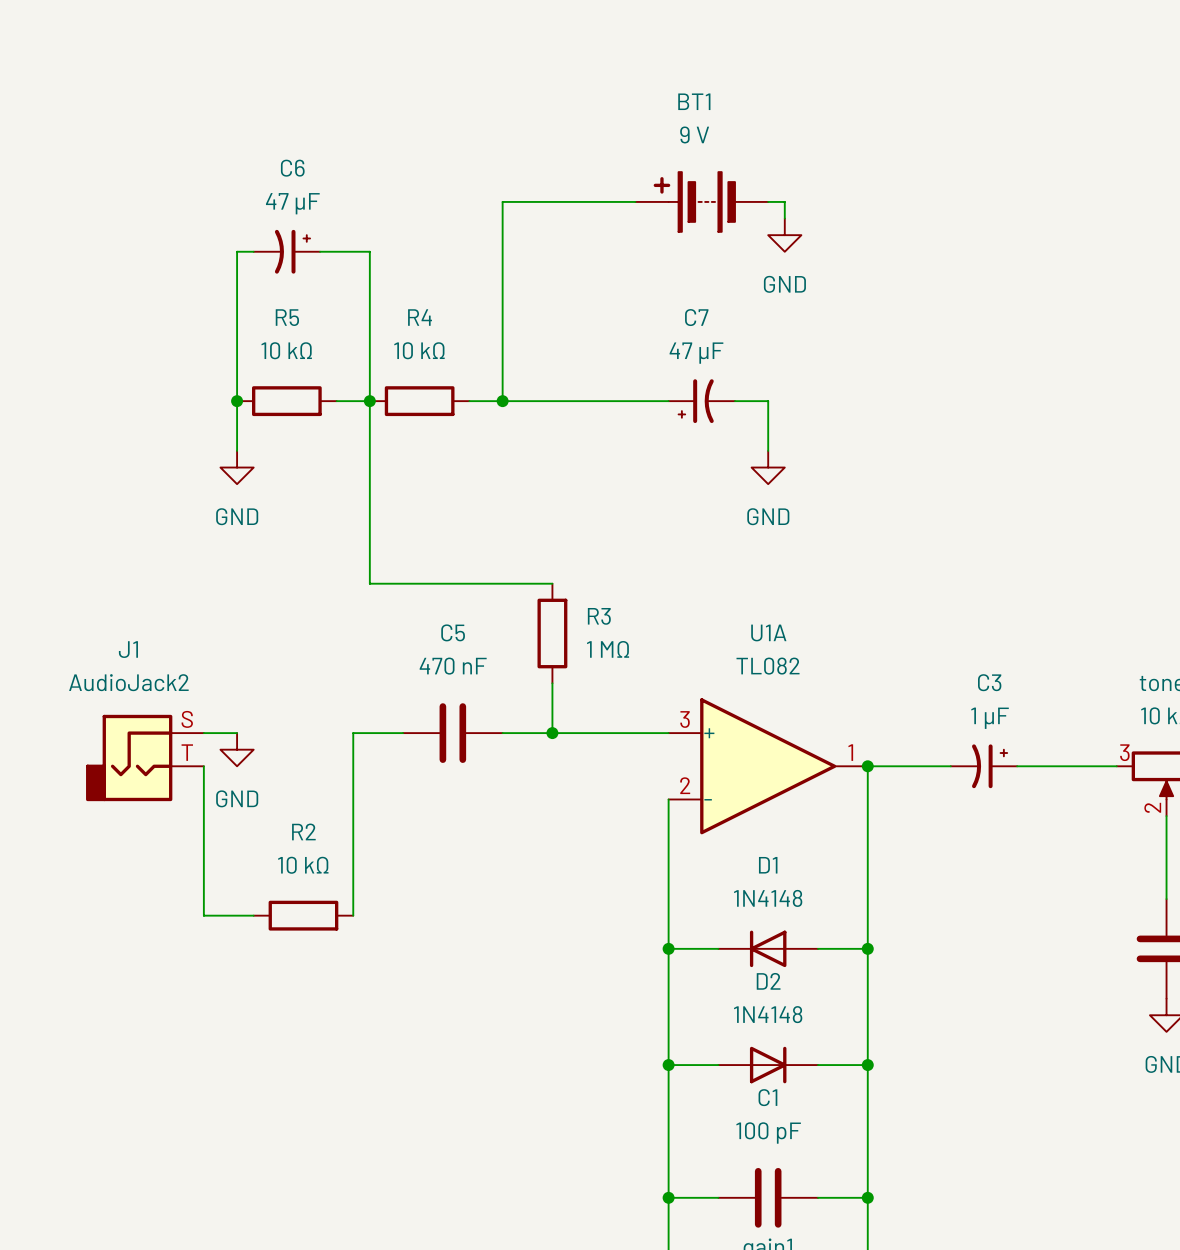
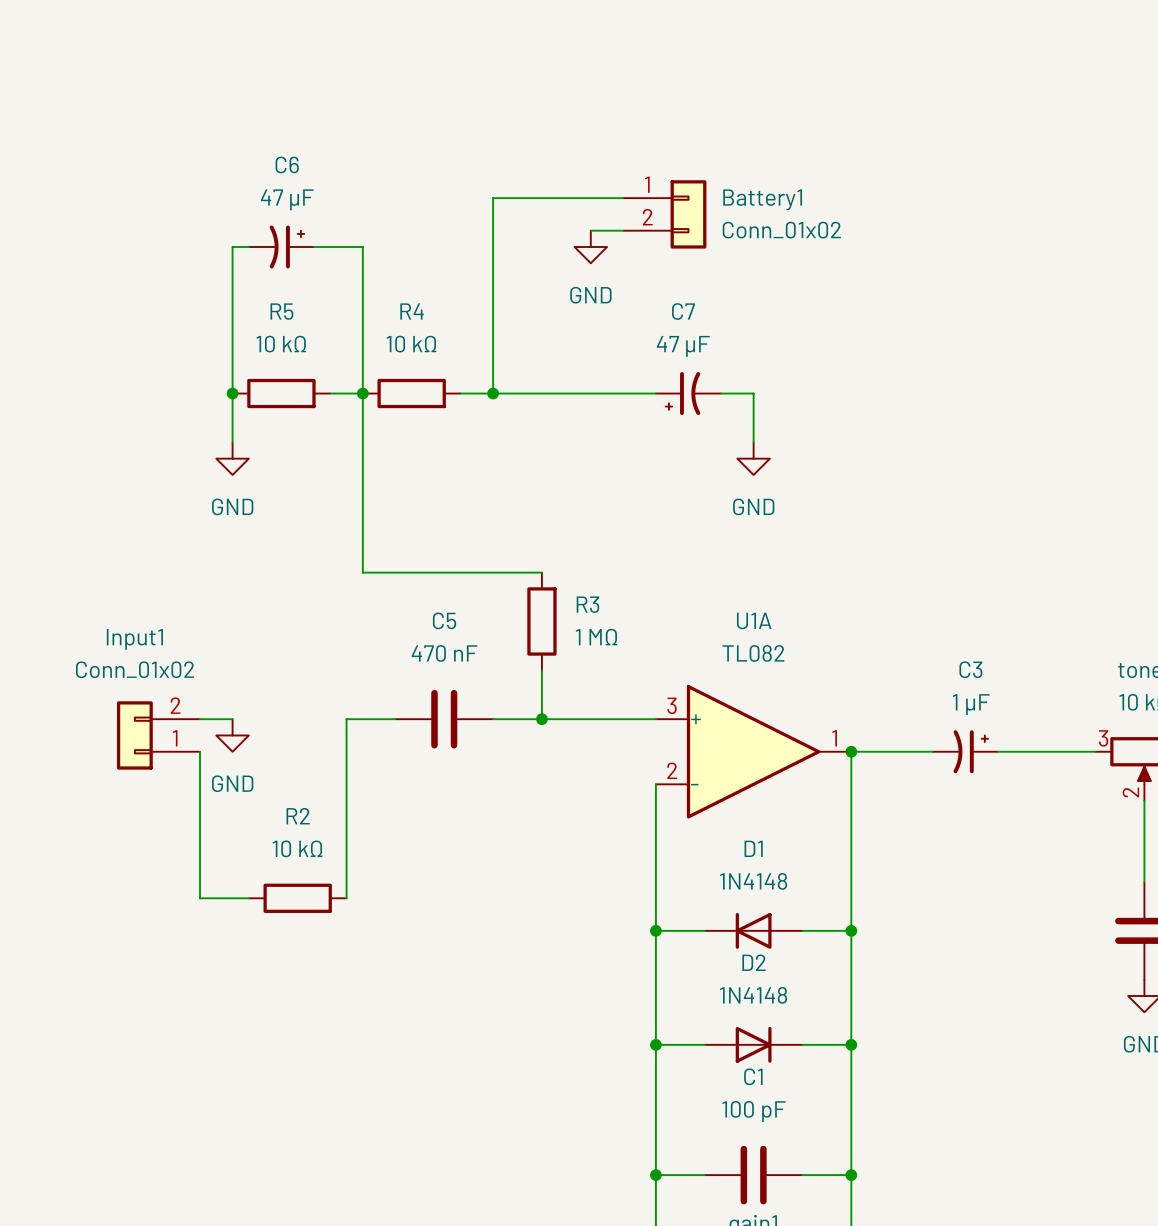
BT1: 9 V (701, 201) -> none
wire: (768, 201) (784, 201) (784, 218) -> none
Battery1: none -> Conn_01x02 (664, 214)
wire: none -> (590, 230) (623, 230)
power symbol position: GND (784, 235) -> GND (590, 246)
Input1: none -> Conn_01x02 (158, 735)
J1: AudioJack2 (144, 757) -> none

